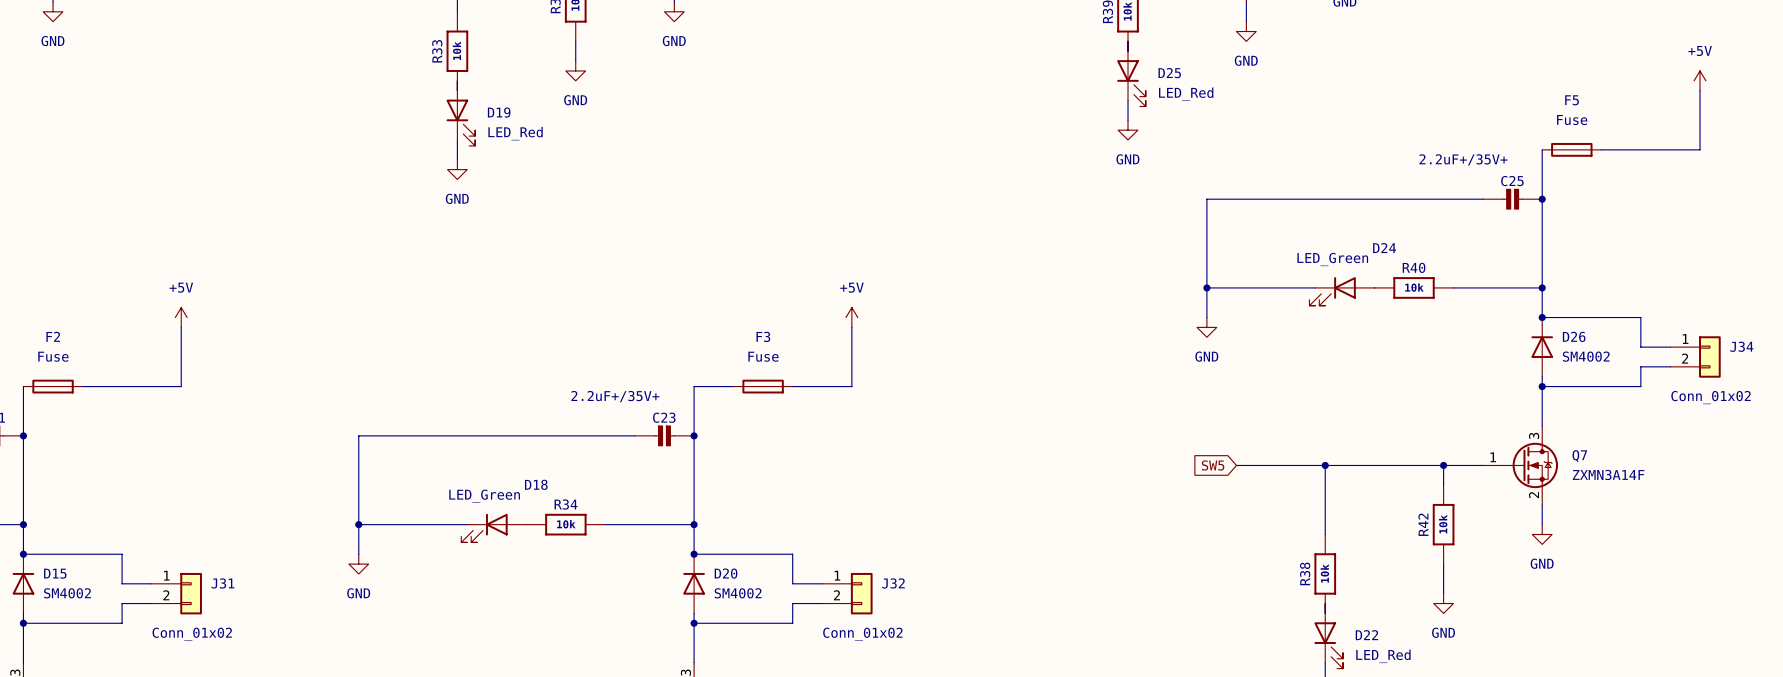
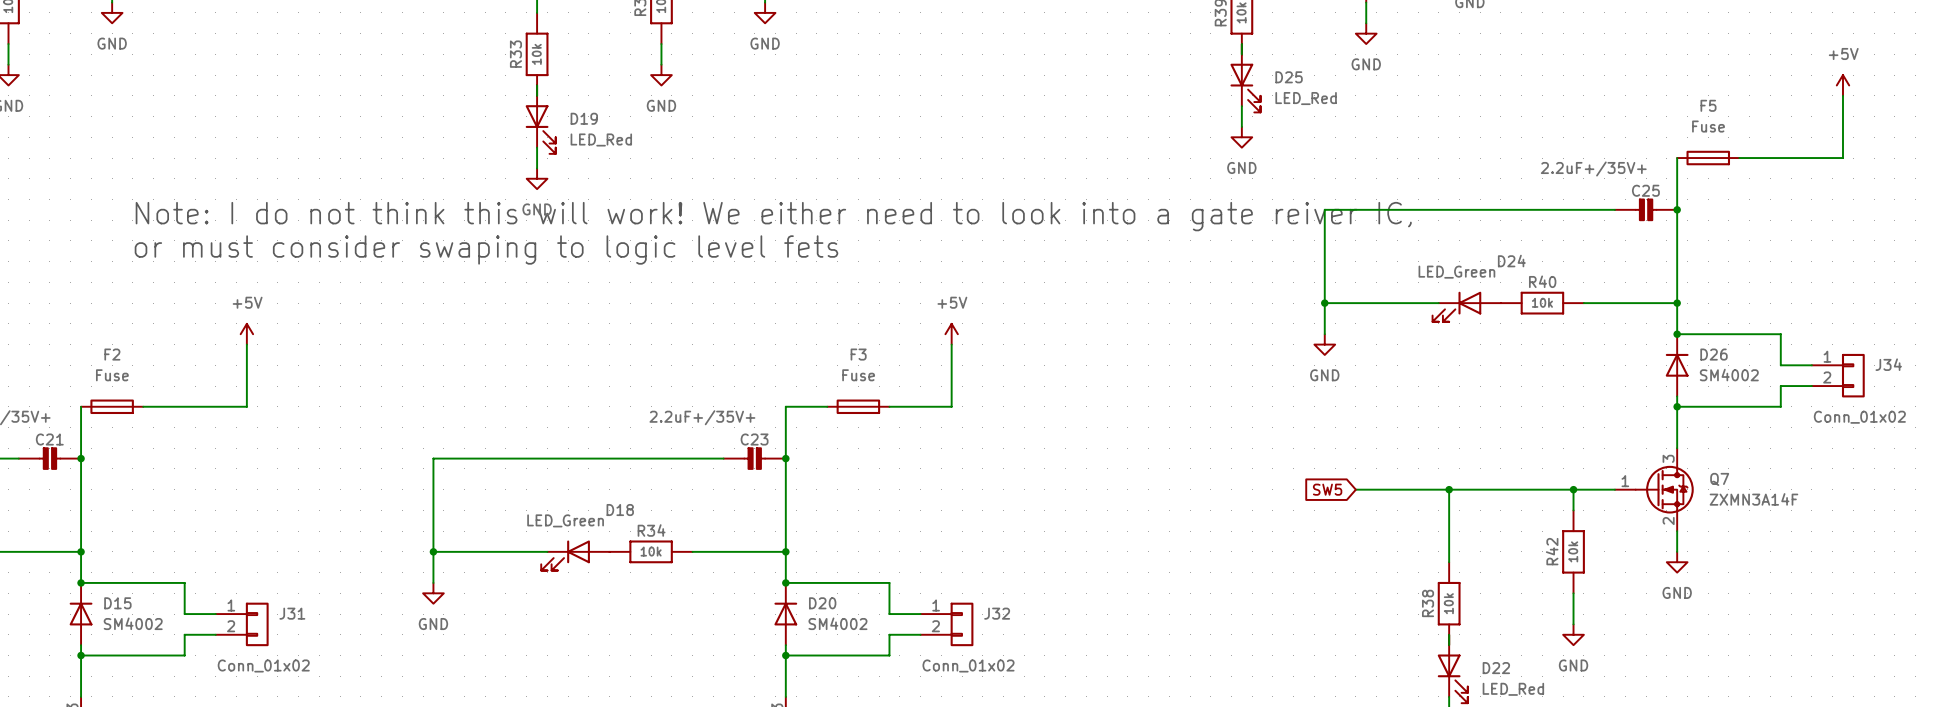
text: none -> Note: I do not think this will work! We either need to look into a gate reiver IC, (773, 216)
text: none -> or must consider swaping to logic level fets (486, 249)

